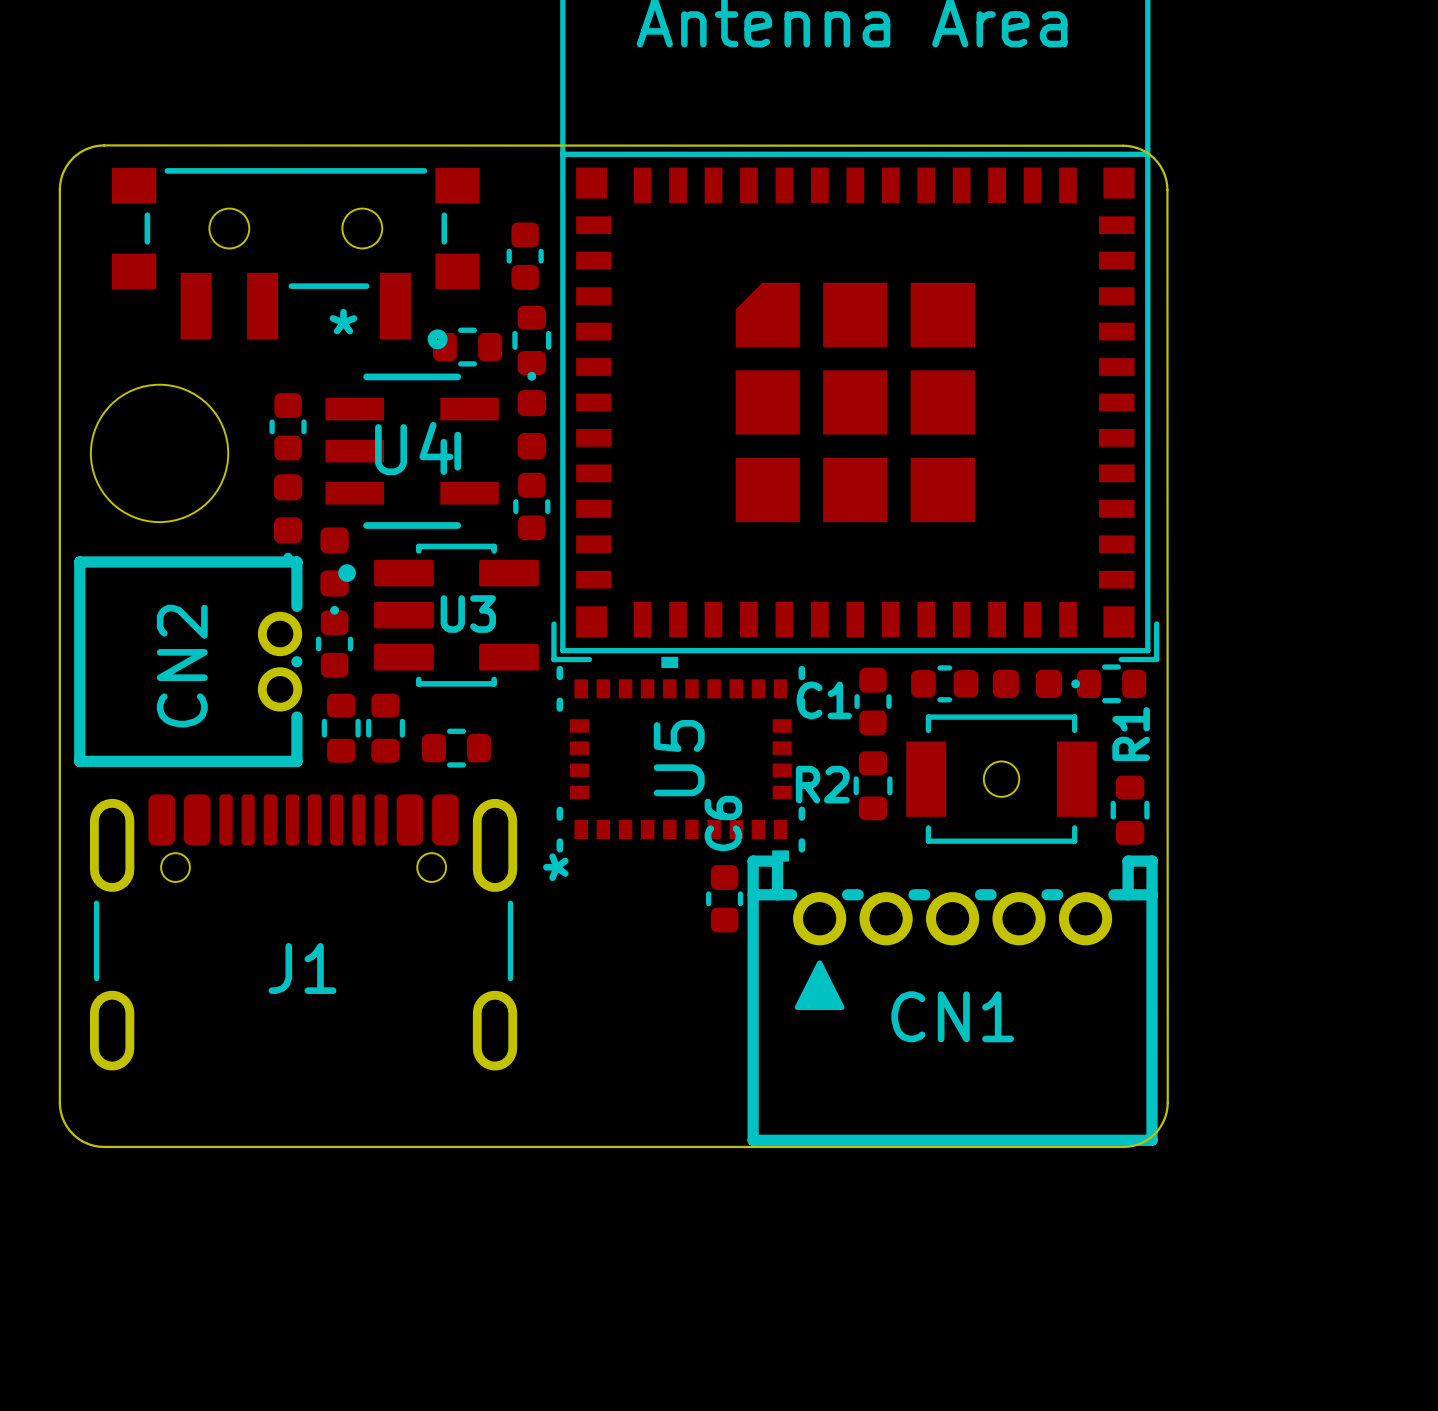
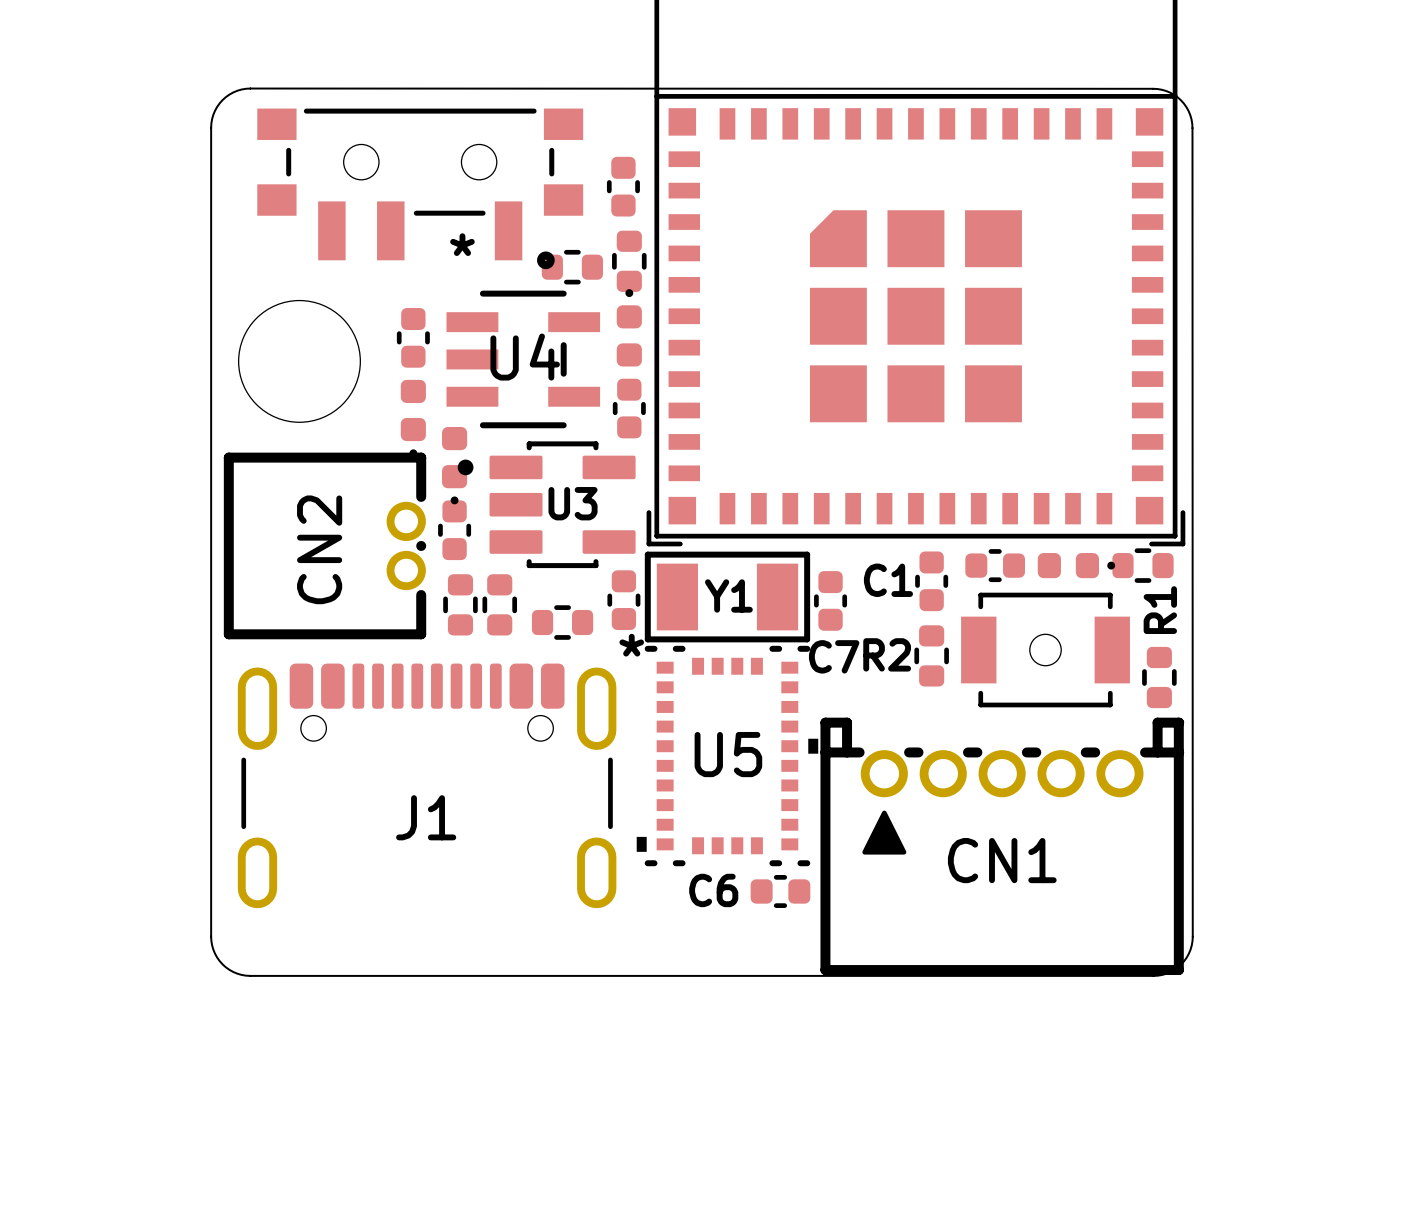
Y1: none -> (727, 597)
part: none -> (623, 600)
C7: none -> (830, 600)
U5 rotation: 0° (680, 759) -> 90° clockwise (727, 756)
C6 name position: C6 (723, 823) -> C6 (713, 890)
C6 rotation: 0° (724, 898) -> 90° clockwise (780, 891)
C6 position: (724, 898) -> (780, 891)

